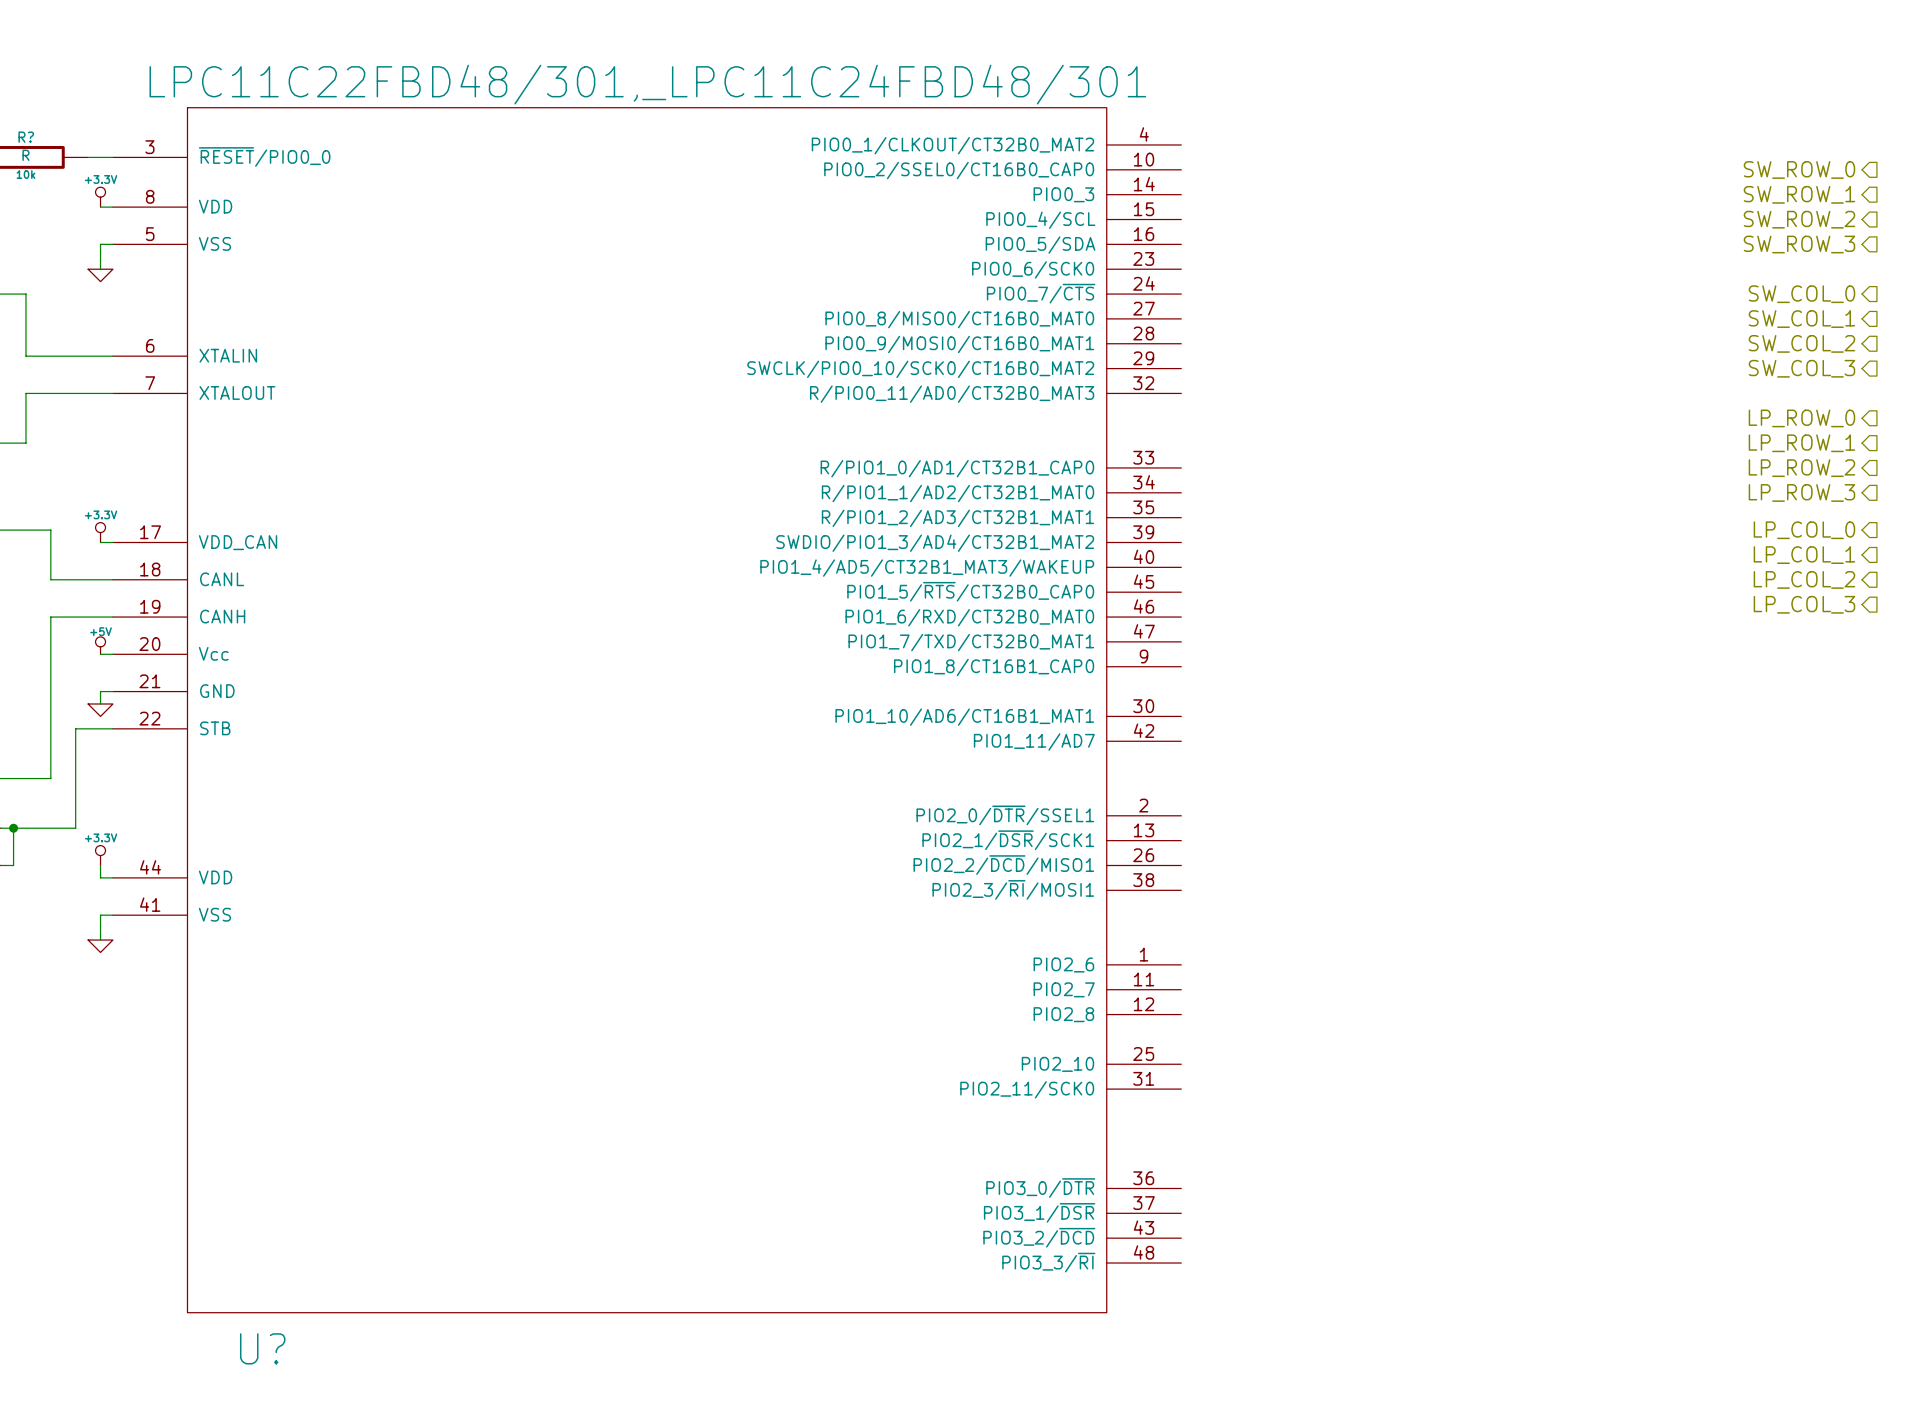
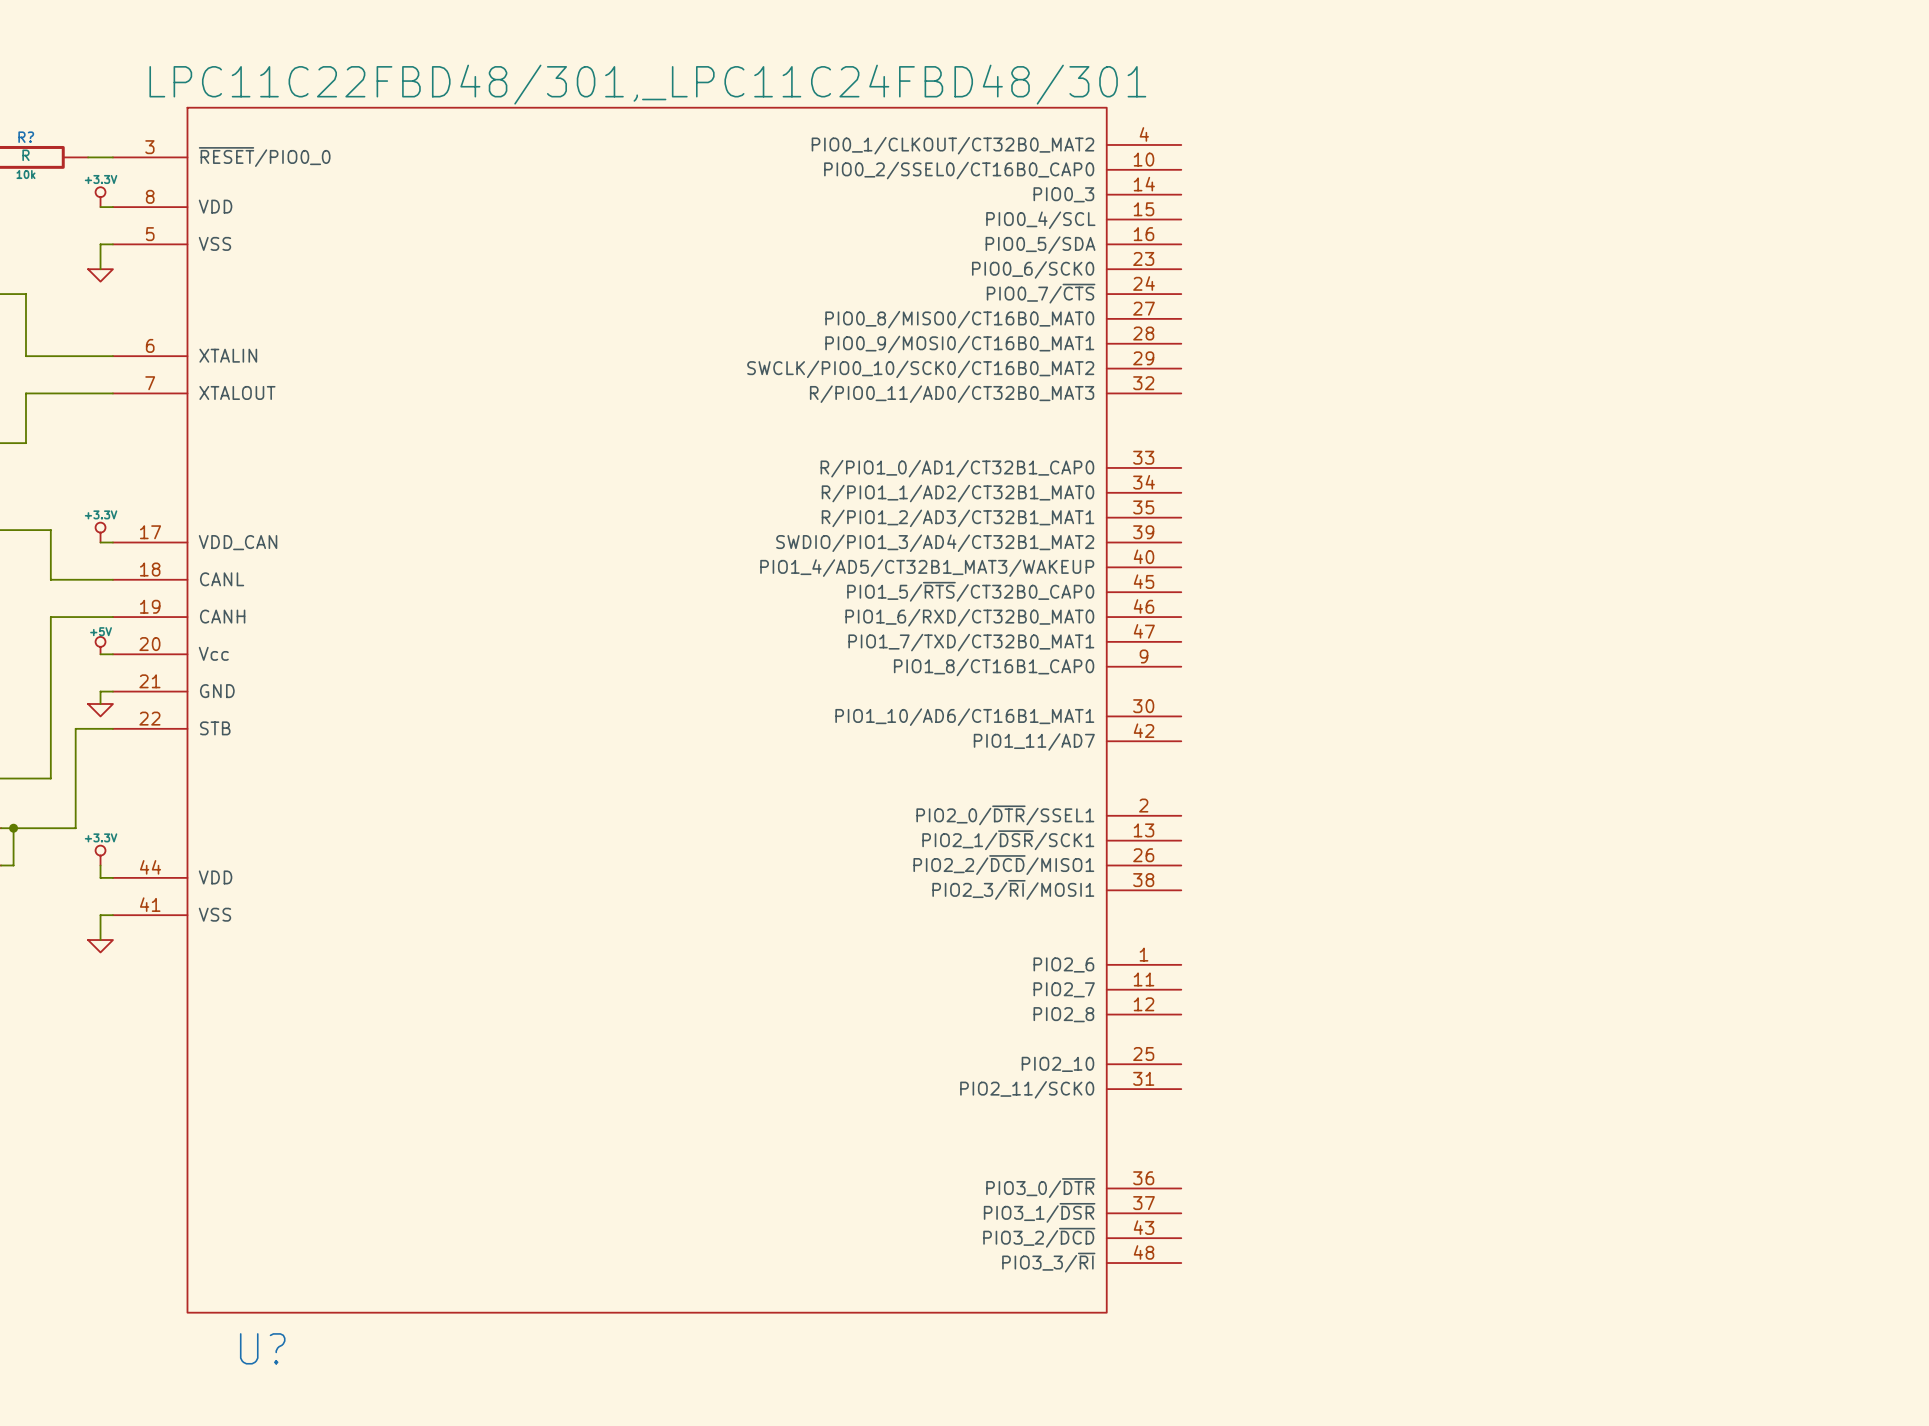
hierarchical label: SW_ROW_0 (1799, 169) -> none
hierarchical label: SW_ROW_1 (1799, 194) -> none
hierarchical label: SW_ROW_2 (1799, 219) -> none
hierarchical label: SW_ROW_3 (1799, 244) -> none
hierarchical label: SW_COL_0 (1801, 294) -> none
hierarchical label: SW_COL_1 (1801, 319) -> none
hierarchical label: SW_COL_2 (1801, 343) -> none
hierarchical label: SW_COL_3 (1801, 368) -> none
hierarchical label: LP_ROW_0 (1801, 418) -> none
hierarchical label: LP_ROW_1 (1801, 443) -> none
hierarchical label: LP_ROW_2 (1801, 468) -> none
hierarchical label: LP_ROW_3 (1801, 492) -> none
hierarchical label: LP_COL_0 (1804, 530) -> none
hierarchical label: LP_COL_1 (1804, 555) -> none
hierarchical label: LP_COL_2 (1804, 579) -> none
hierarchical label: LP_COL_3 (1804, 604) -> none

